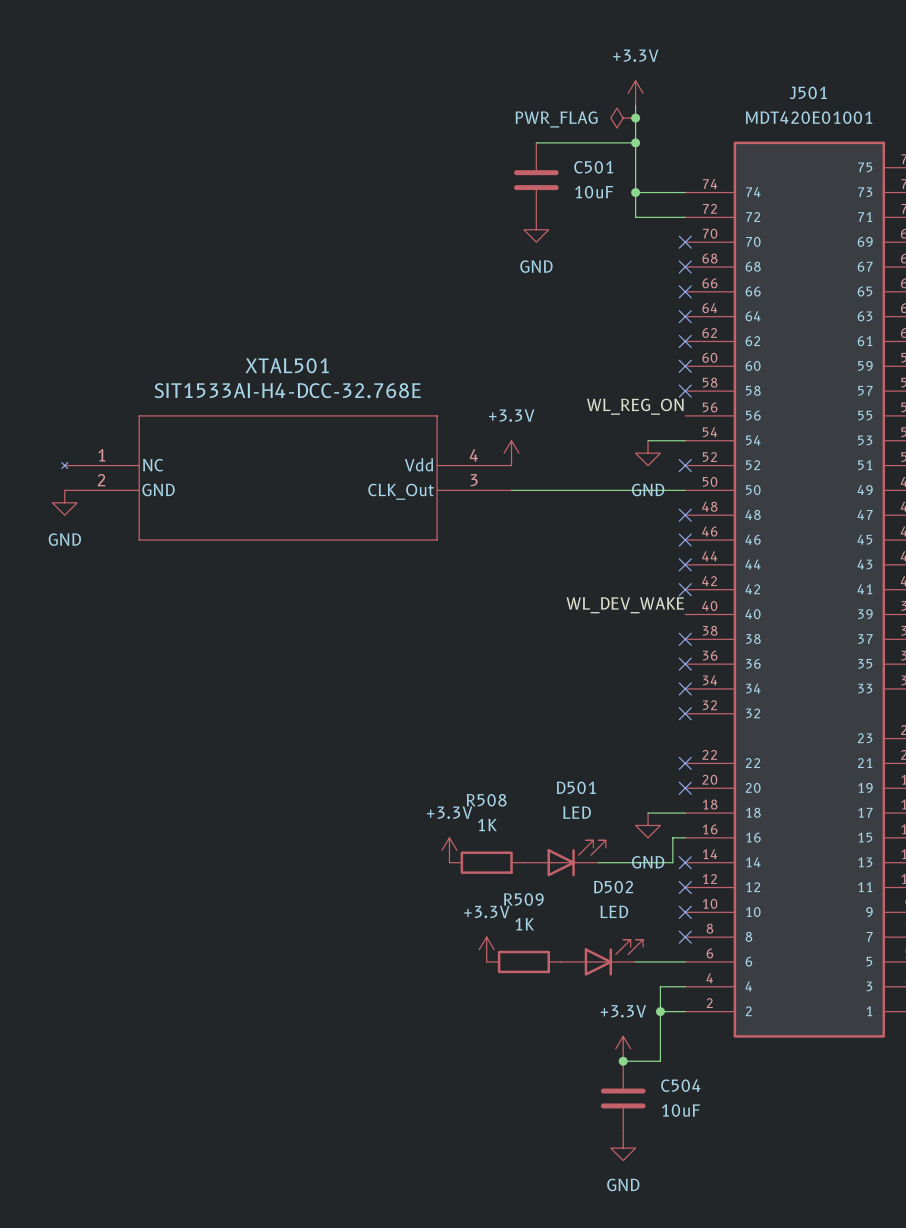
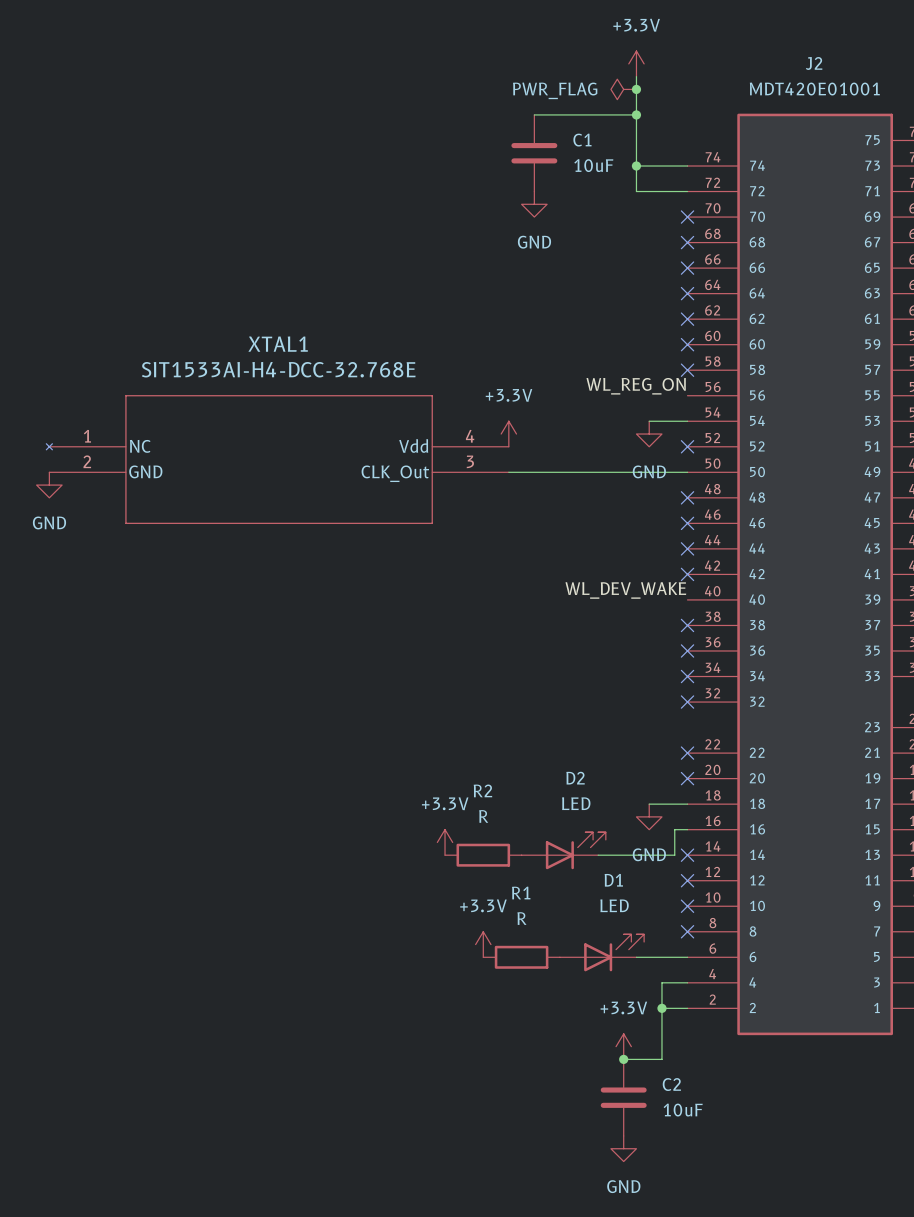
J501 name: J501 (808, 92) -> J2 (814, 63)
C501 name: C501 (593, 167) -> C1 (582, 140)
XTAL501 name: XTAL501 (287, 365) -> XTAL1 (278, 344)
D501 name: D501 (576, 787) -> D2 (575, 778)
R508 name: R508 (486, 800) -> R2 (482, 790)
R508 value: 1K (487, 824) -> R (483, 816)
D502 name: D502 (613, 887) -> D1 (613, 880)
R509 name: R509 (523, 899) -> R1 (521, 893)
R509 value: 1K (524, 924) -> R (521, 918)
C504 name: C504 (680, 1085) -> C2 (671, 1084)

